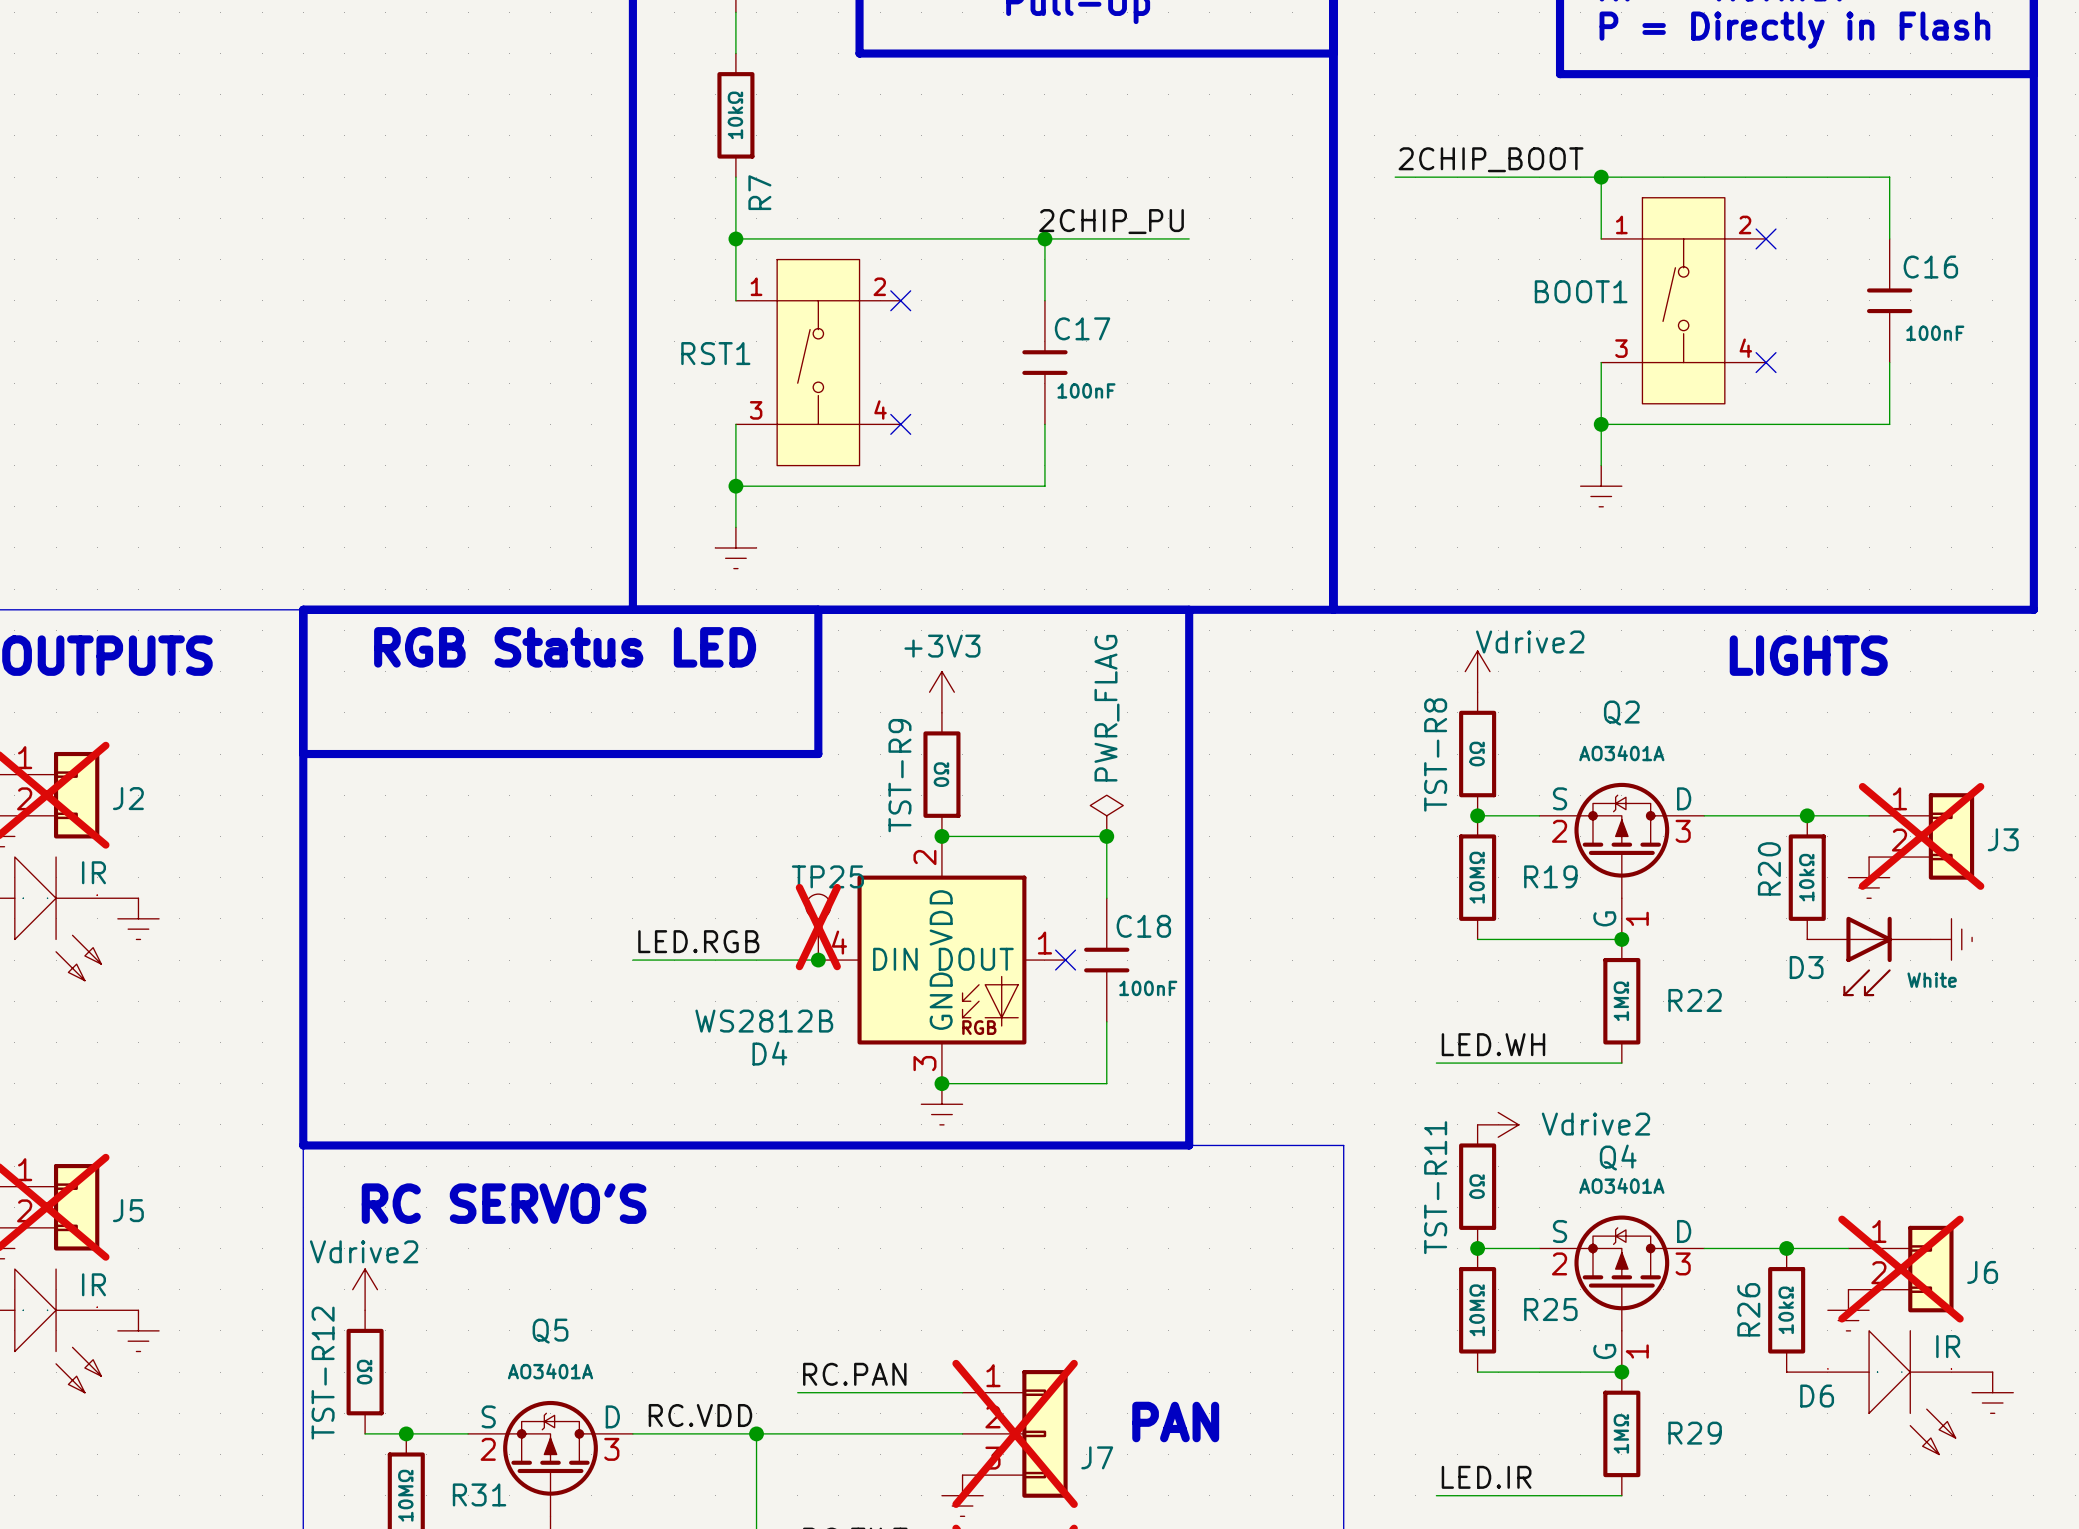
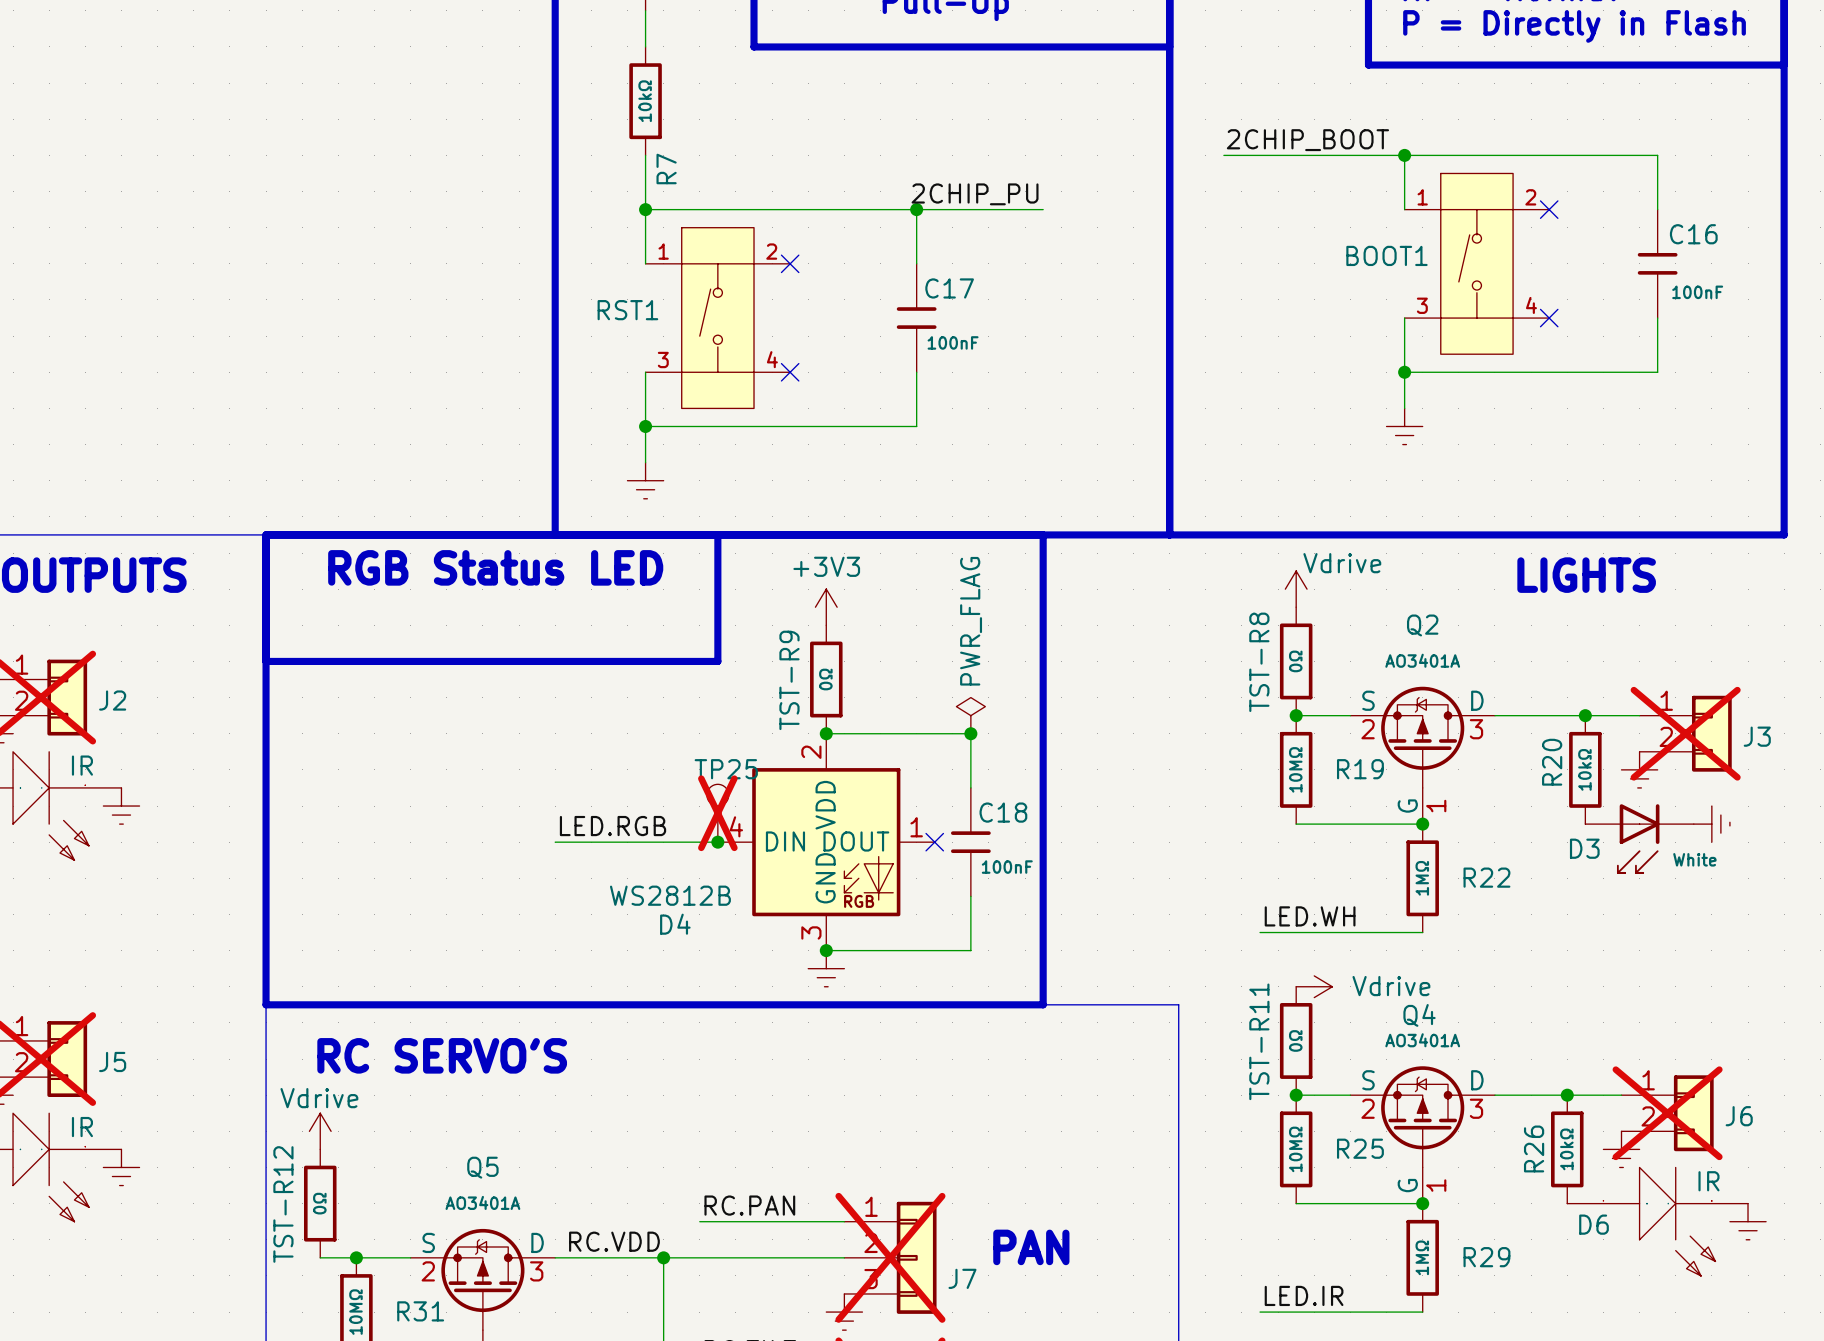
power symbol: Vdrive2 (1477, 671) -> Vdrive (1296, 589)
power symbol: Vdrive2 (1498, 1124) -> Vdrive (1314, 986)
power symbol: Vdrive2 (365, 1289) -> Vdrive (320, 1131)

